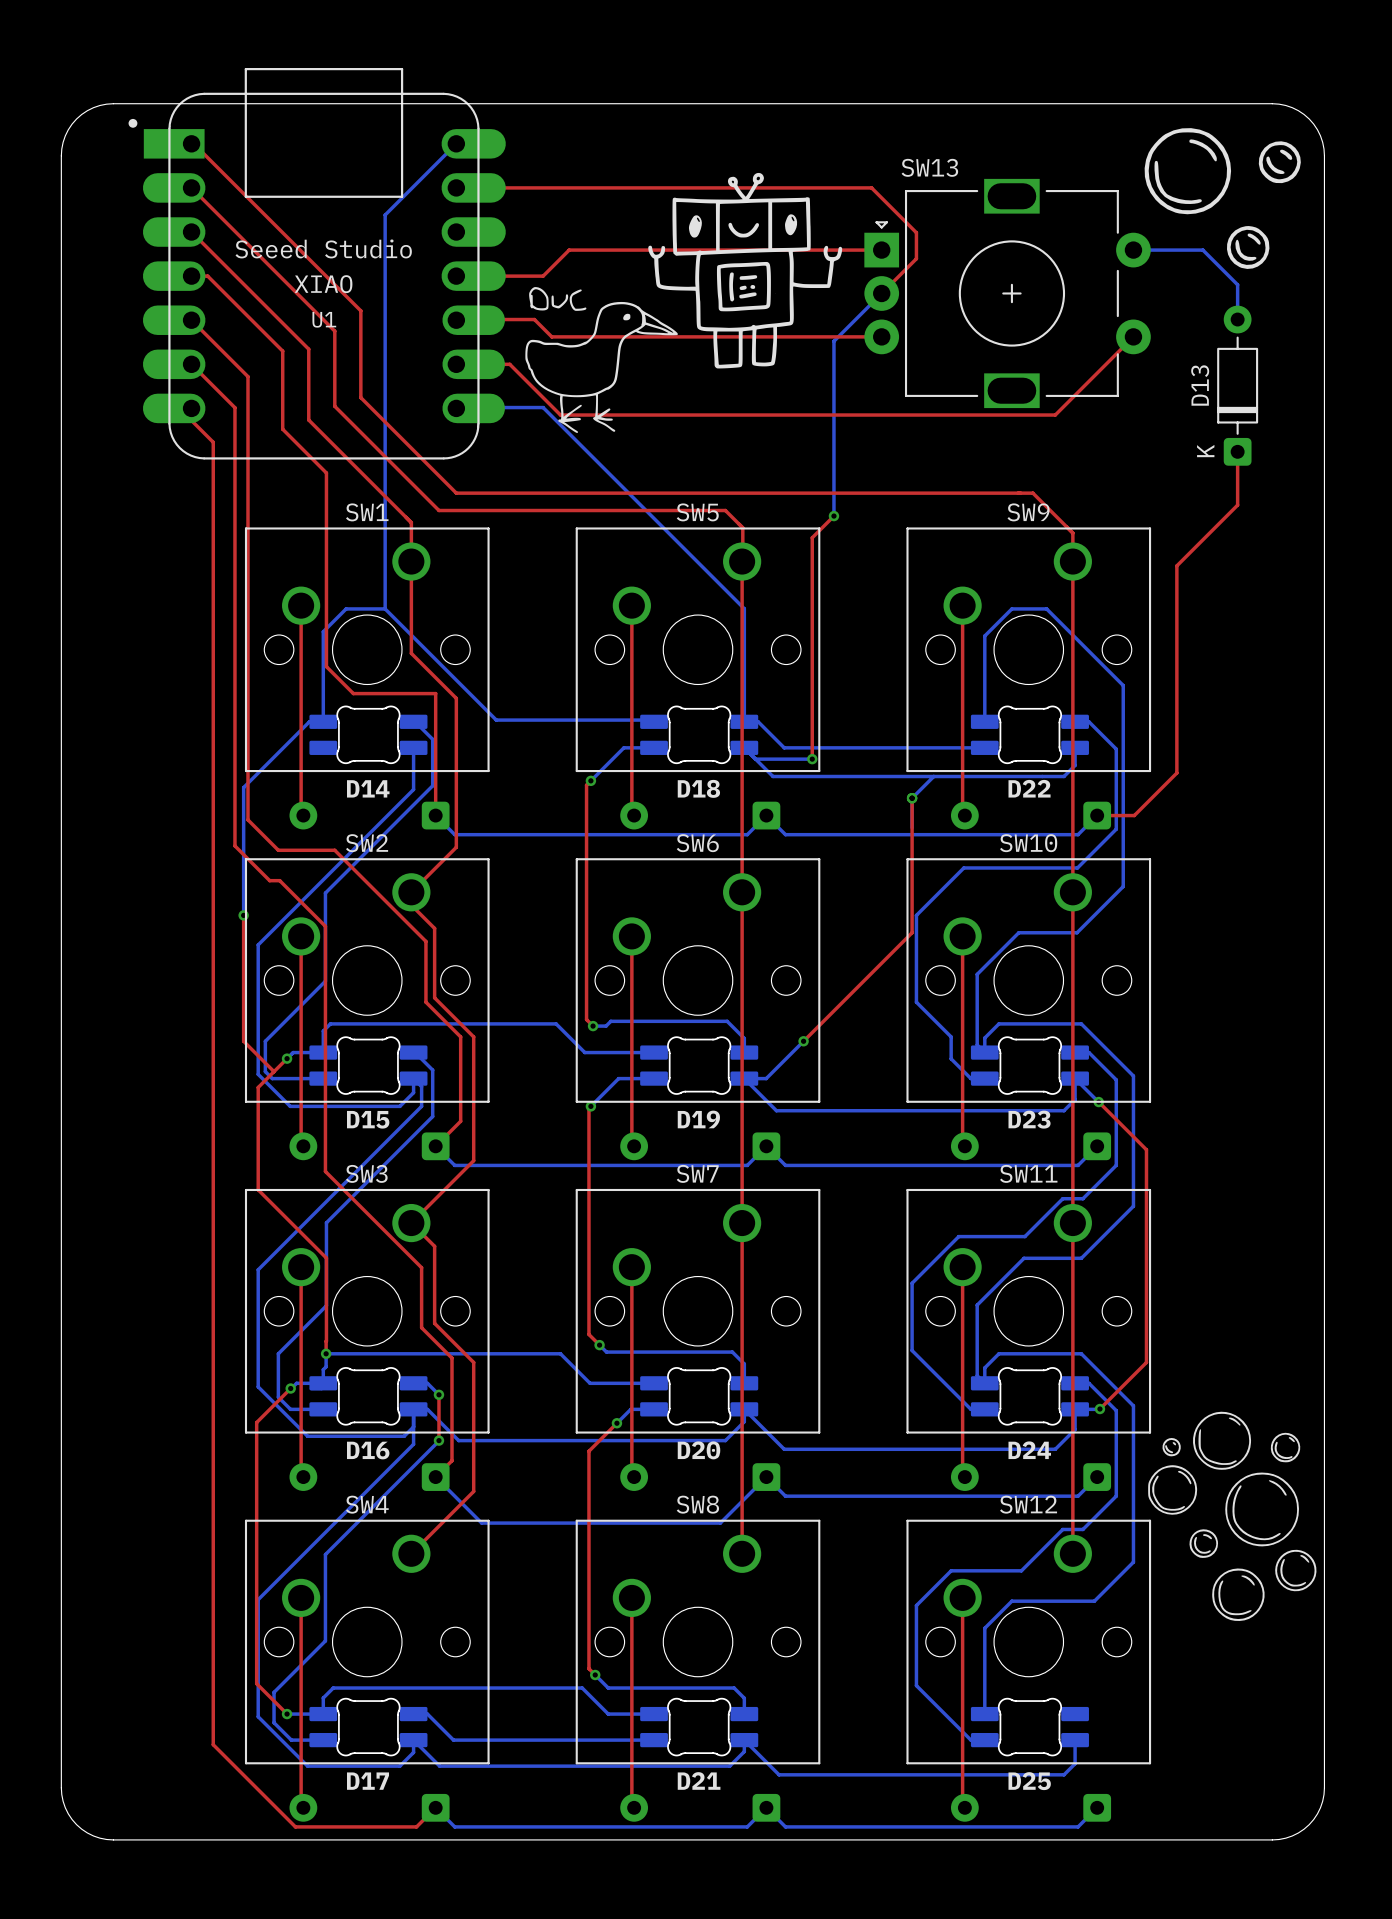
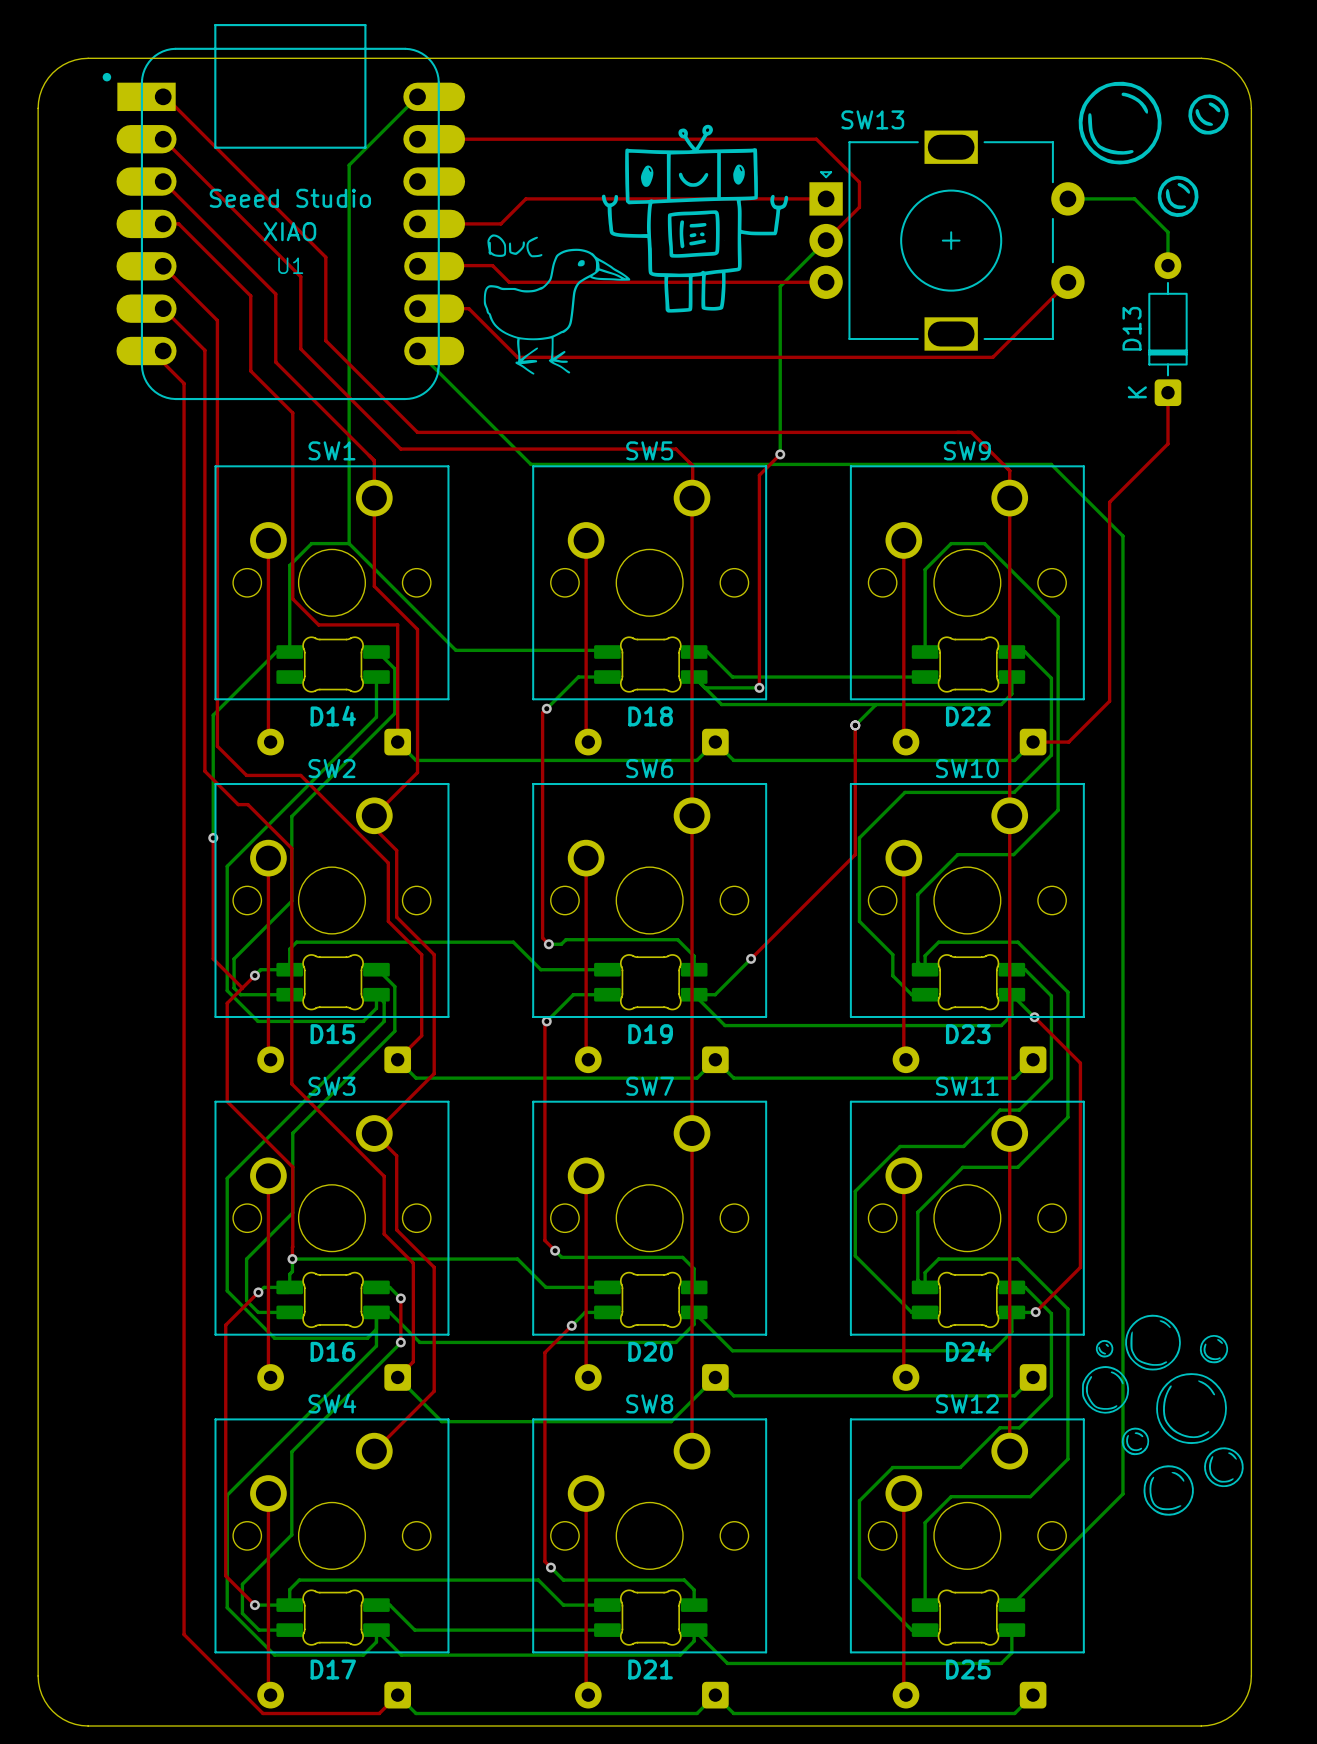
bottom track: (457, 407) (543, 407) (744, 608) (744, 721) -> none
bottom track: none -> (417, 351) (530, 464) (1051, 464) (1122, 536) (1122, 1493) (1011, 1605)

